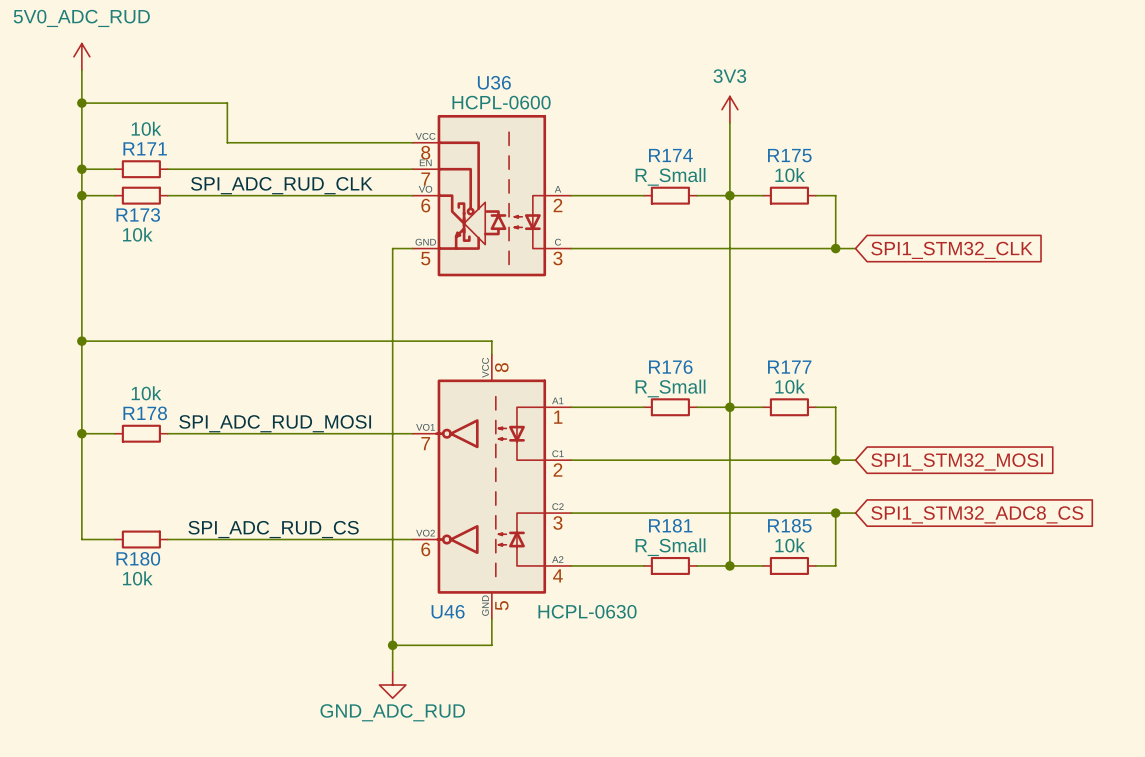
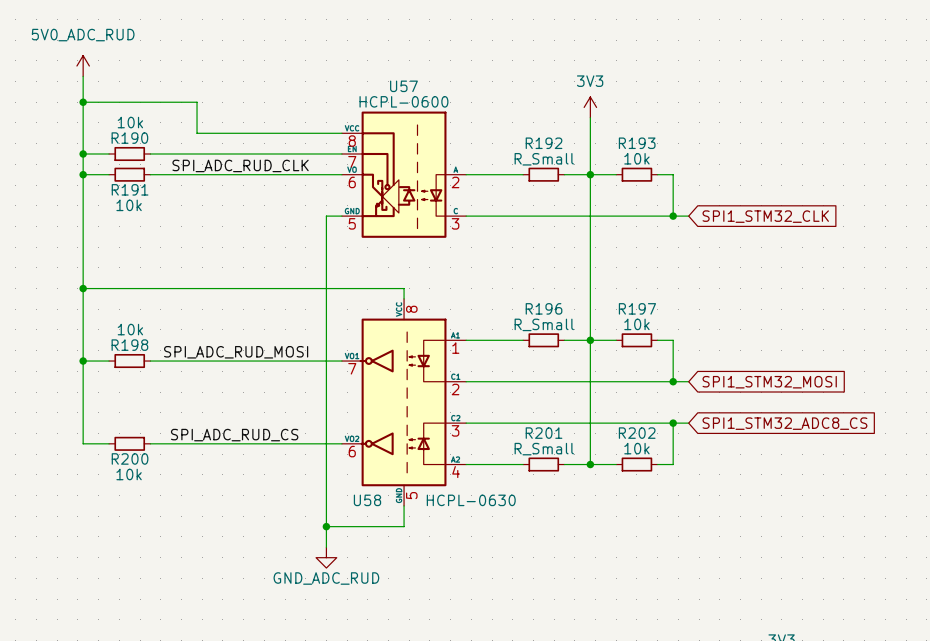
U36 name: U36 (494, 82) -> U57 (403, 86)
R171 name: R171 (145, 148) -> R190 (129, 138)
R174 name: R174 (670, 155) -> R192 (544, 143)
R175 name: R175 (789, 155) -> R193 (637, 143)
R173 name: R173 (138, 215) -> R191 (130, 189)
R176 name: R176 (670, 367) -> R196 (544, 308)
R177 name: R177 (789, 367) -> R197 (637, 308)
R178 name: R178 (145, 413) -> R198 (129, 345)
R181 name: R181 (670, 525) -> R201 (544, 433)
R185 name: R185 (789, 525) -> R202 (637, 433)
R180 name: R180 (138, 558) -> R200 (130, 458)
U46 name: U46 (448, 611) -> U58 (367, 500)

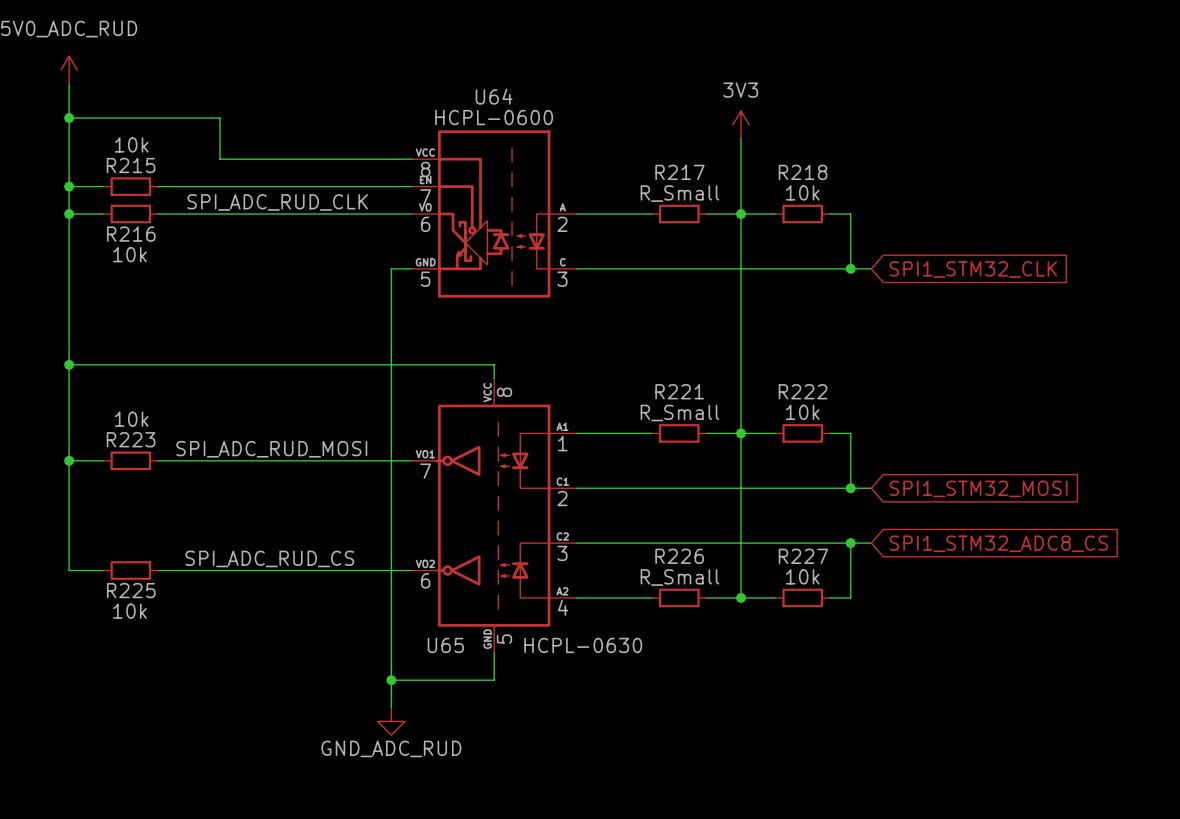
U57 name: U57 (403, 86) -> U64 (494, 96)
R190 name: R190 (129, 138) -> R215 (131, 165)
R192 name: R192 (544, 143) -> R217 (679, 172)
R193 name: R193 (637, 143) -> R218 (803, 172)
R191 name: R191 (130, 189) -> R216 (131, 234)
R196 name: R196 (544, 308) -> R221 (679, 391)
R197 name: R197 (637, 308) -> R222 (803, 391)
R198 name: R198 (129, 345) -> R223 (131, 439)
R201 name: R201 (544, 433) -> R226 (679, 556)
R202 name: R202 (637, 433) -> R227 (803, 556)
R200 name: R200 (130, 458) -> R225 (131, 590)
U58 name: U58 (367, 500) -> U65 (445, 645)

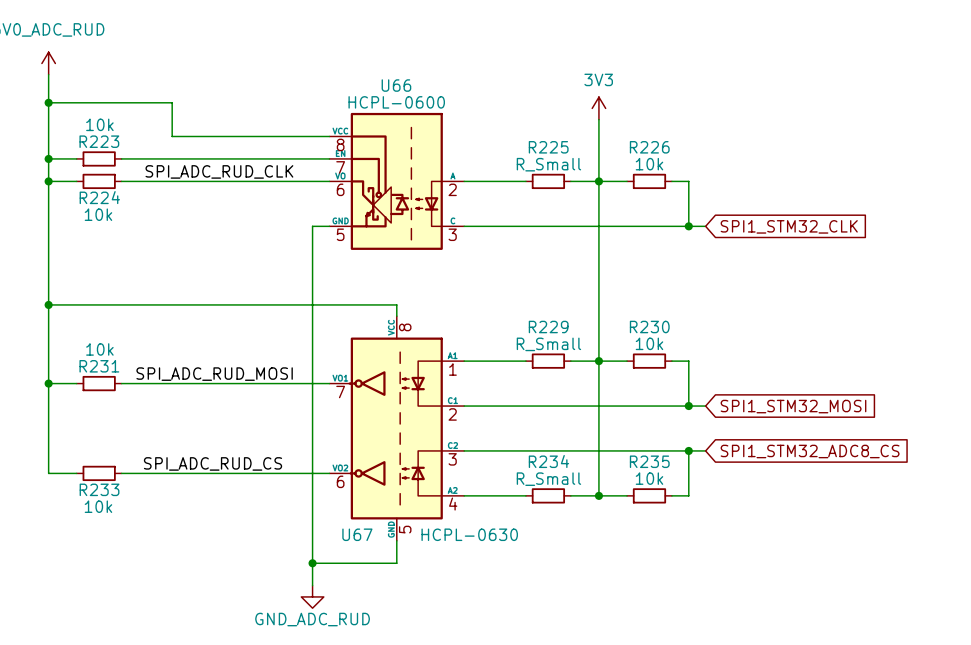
U64 name: U64 (494, 96) -> U66 (396, 85)
R215 name: R215 (131, 165) -> R223 (99, 141)
R217 name: R217 (679, 172) -> R225 (548, 147)
R218 name: R218 (803, 172) -> R226 (649, 147)
R216 name: R216 (131, 234) -> R224 (99, 197)
R221 name: R221 (679, 391) -> R229 (548, 327)
R222 name: R222 (803, 391) -> R230 (649, 327)
R223 name: R223 (131, 439) -> R231 (99, 366)
R226 name: R226 (679, 556) -> R234 (548, 461)
R227 name: R227 (803, 556) -> R235 (649, 461)
R225 name: R225 (131, 590) -> R233 (99, 489)
U65 name: U65 (445, 645) -> U67 (357, 534)

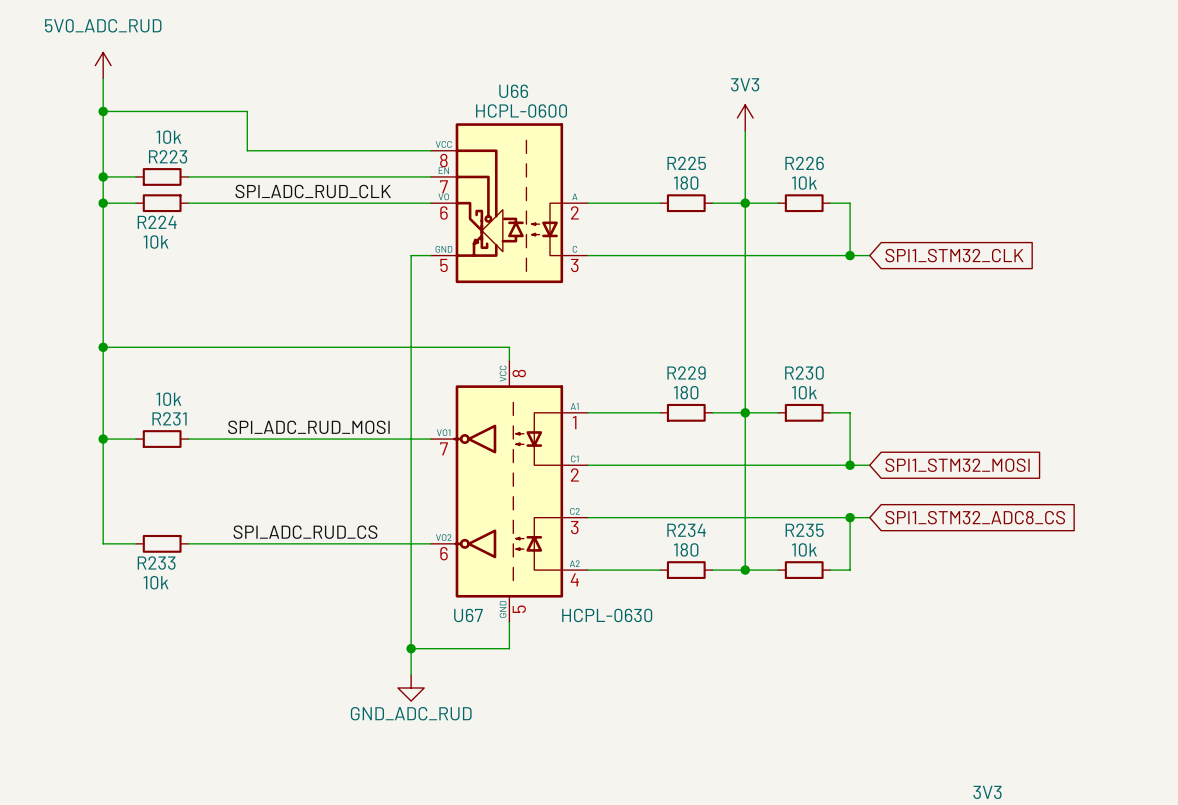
R225 value: R_Small (548, 164) -> 180 (686, 183)
R229 value: R_Small (548, 344) -> 180 (686, 392)
R234 value: R_Small (548, 479) -> 180 (686, 549)

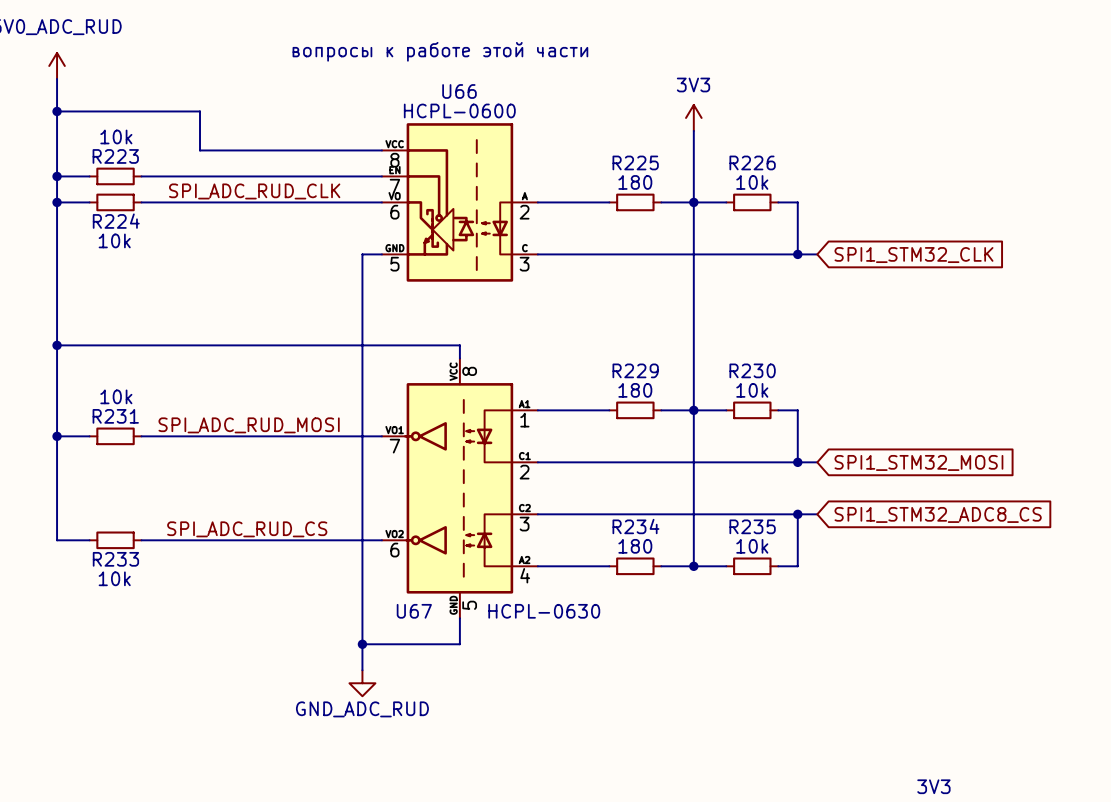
text: none -> вопросы к работе этой части (440, 51)

